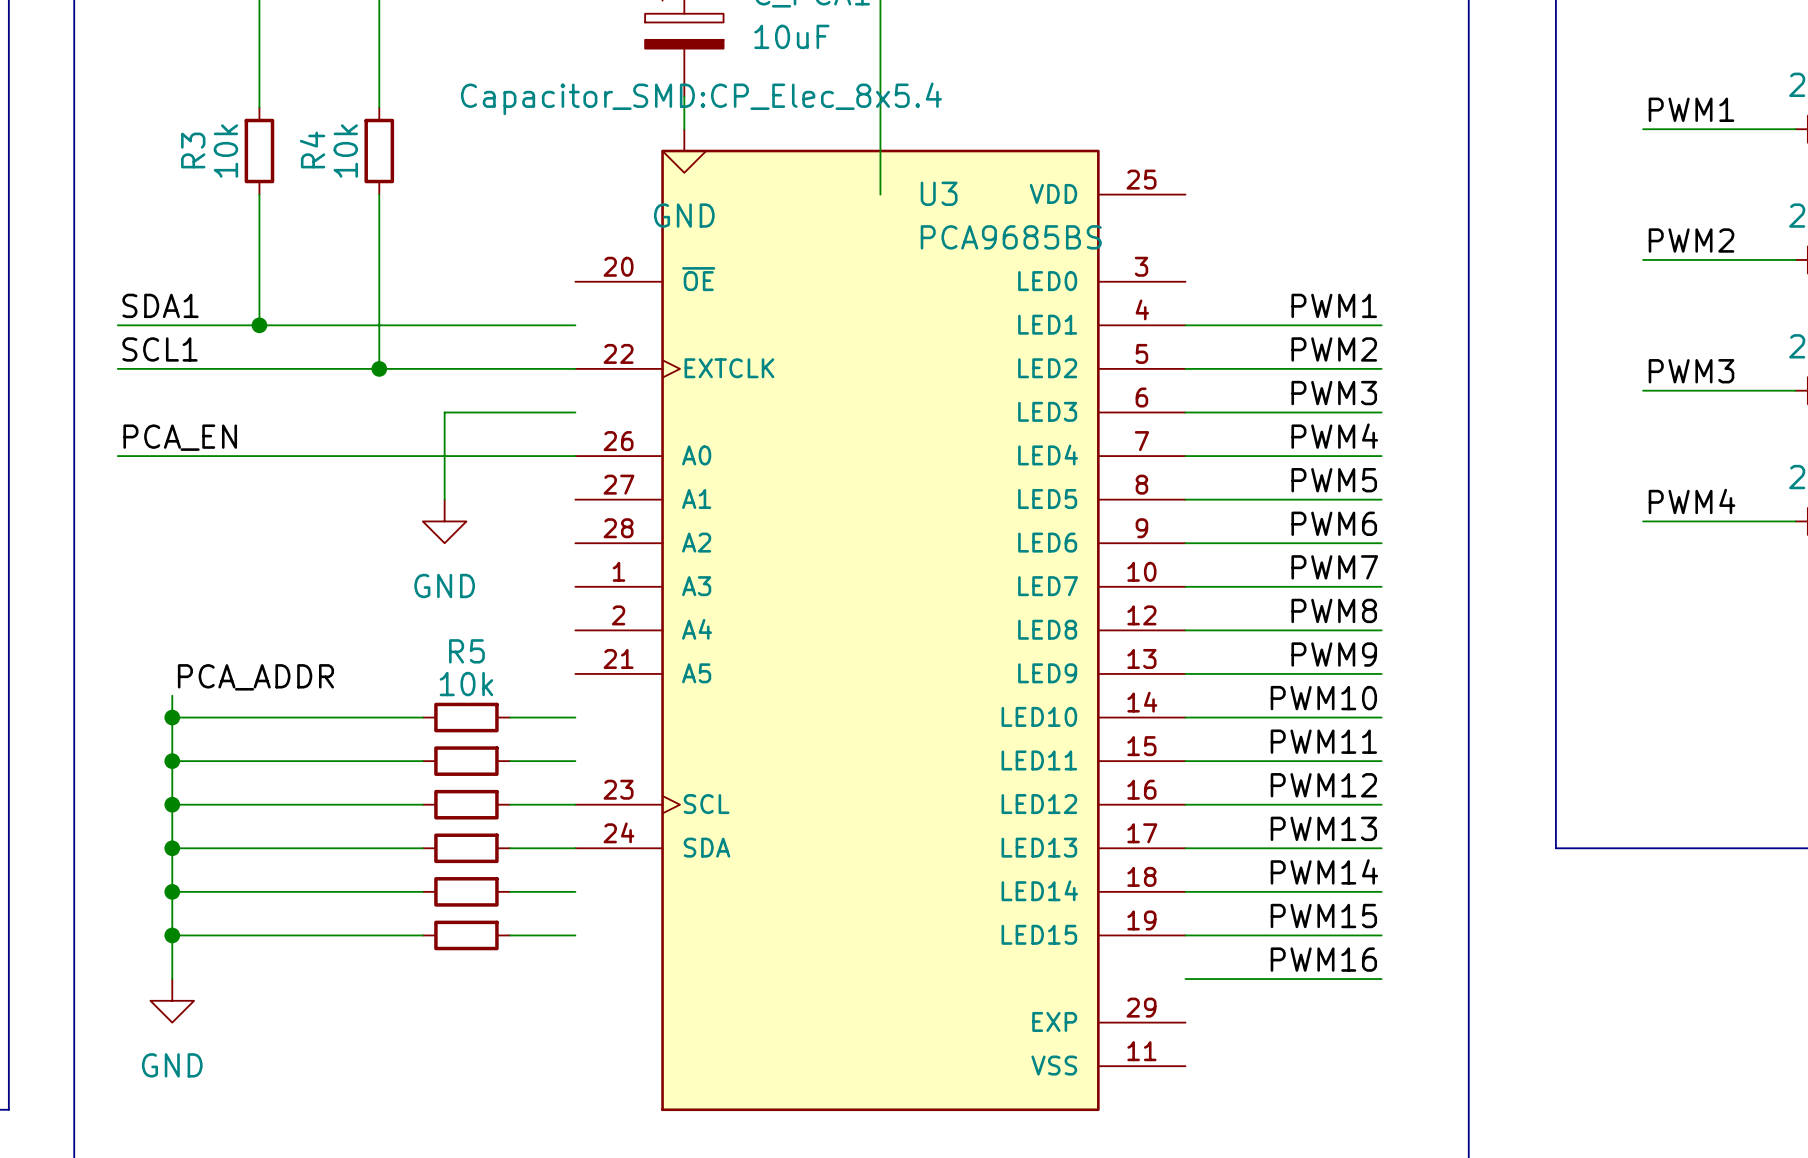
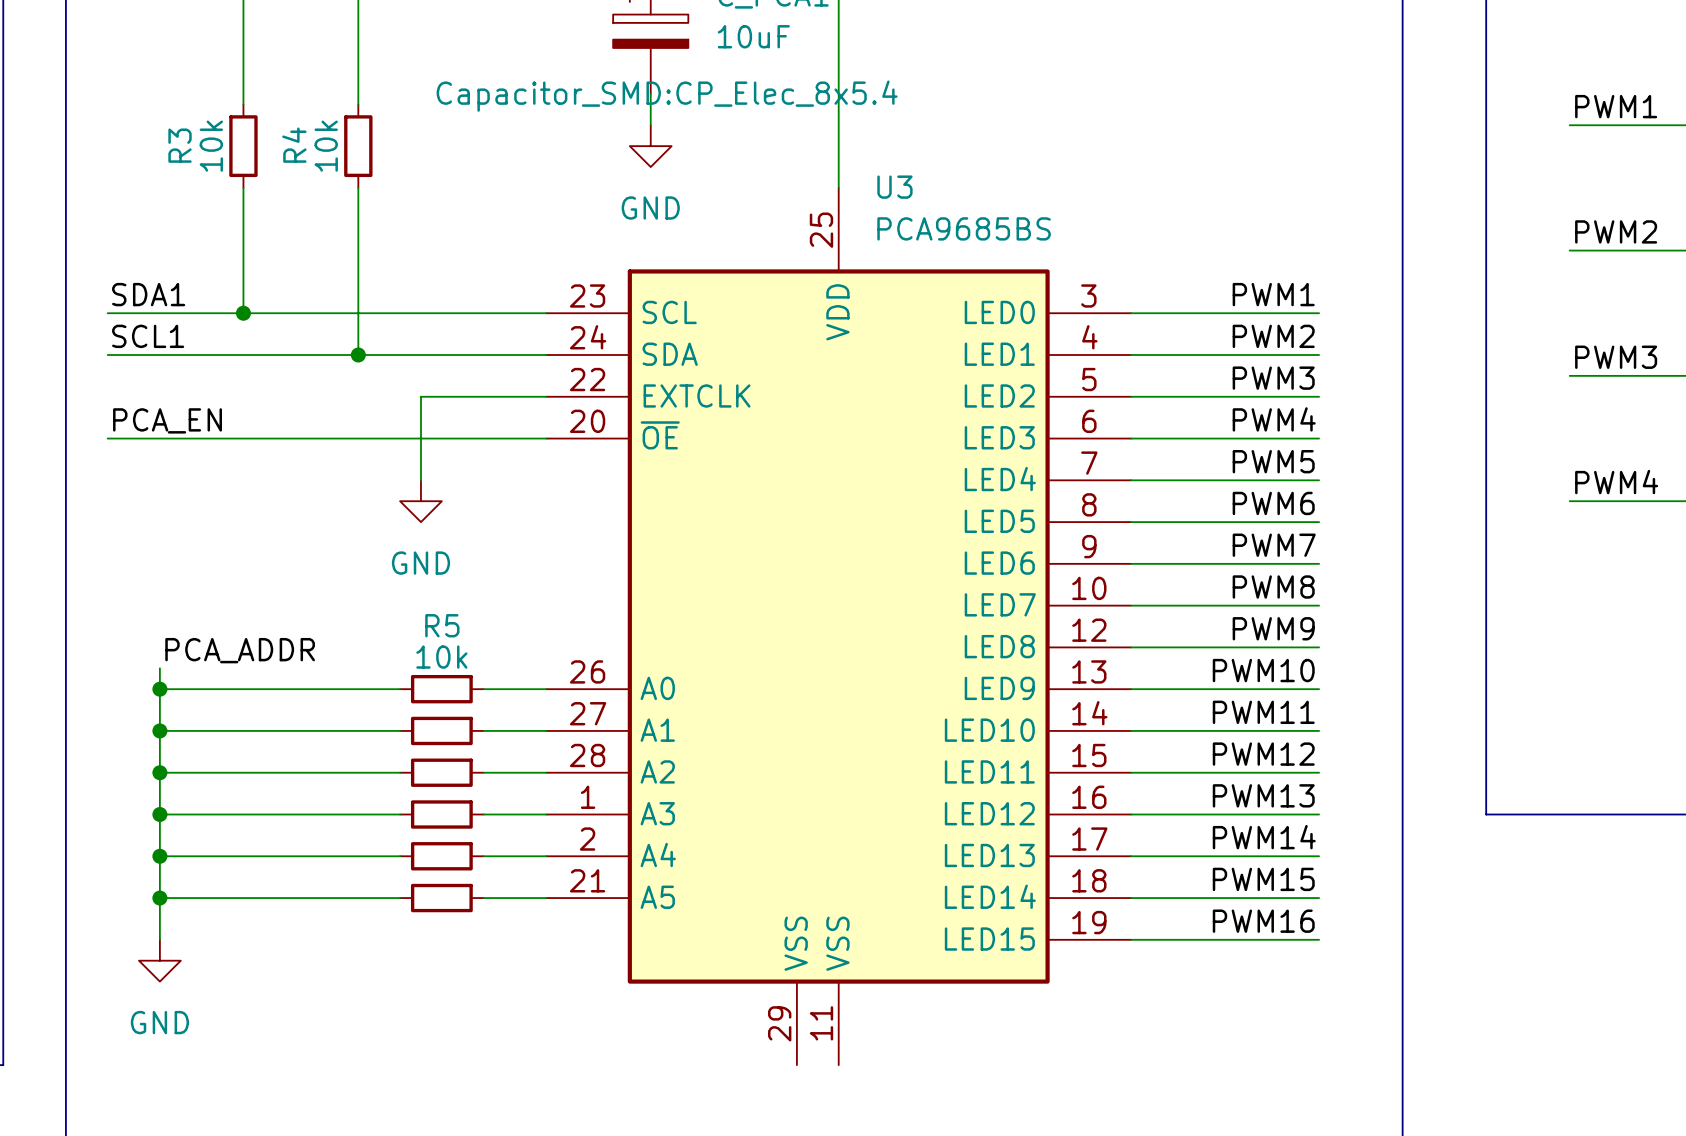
U3 symbol: [575, 149, 1186, 1112] -> [546, 187, 1132, 1066]

